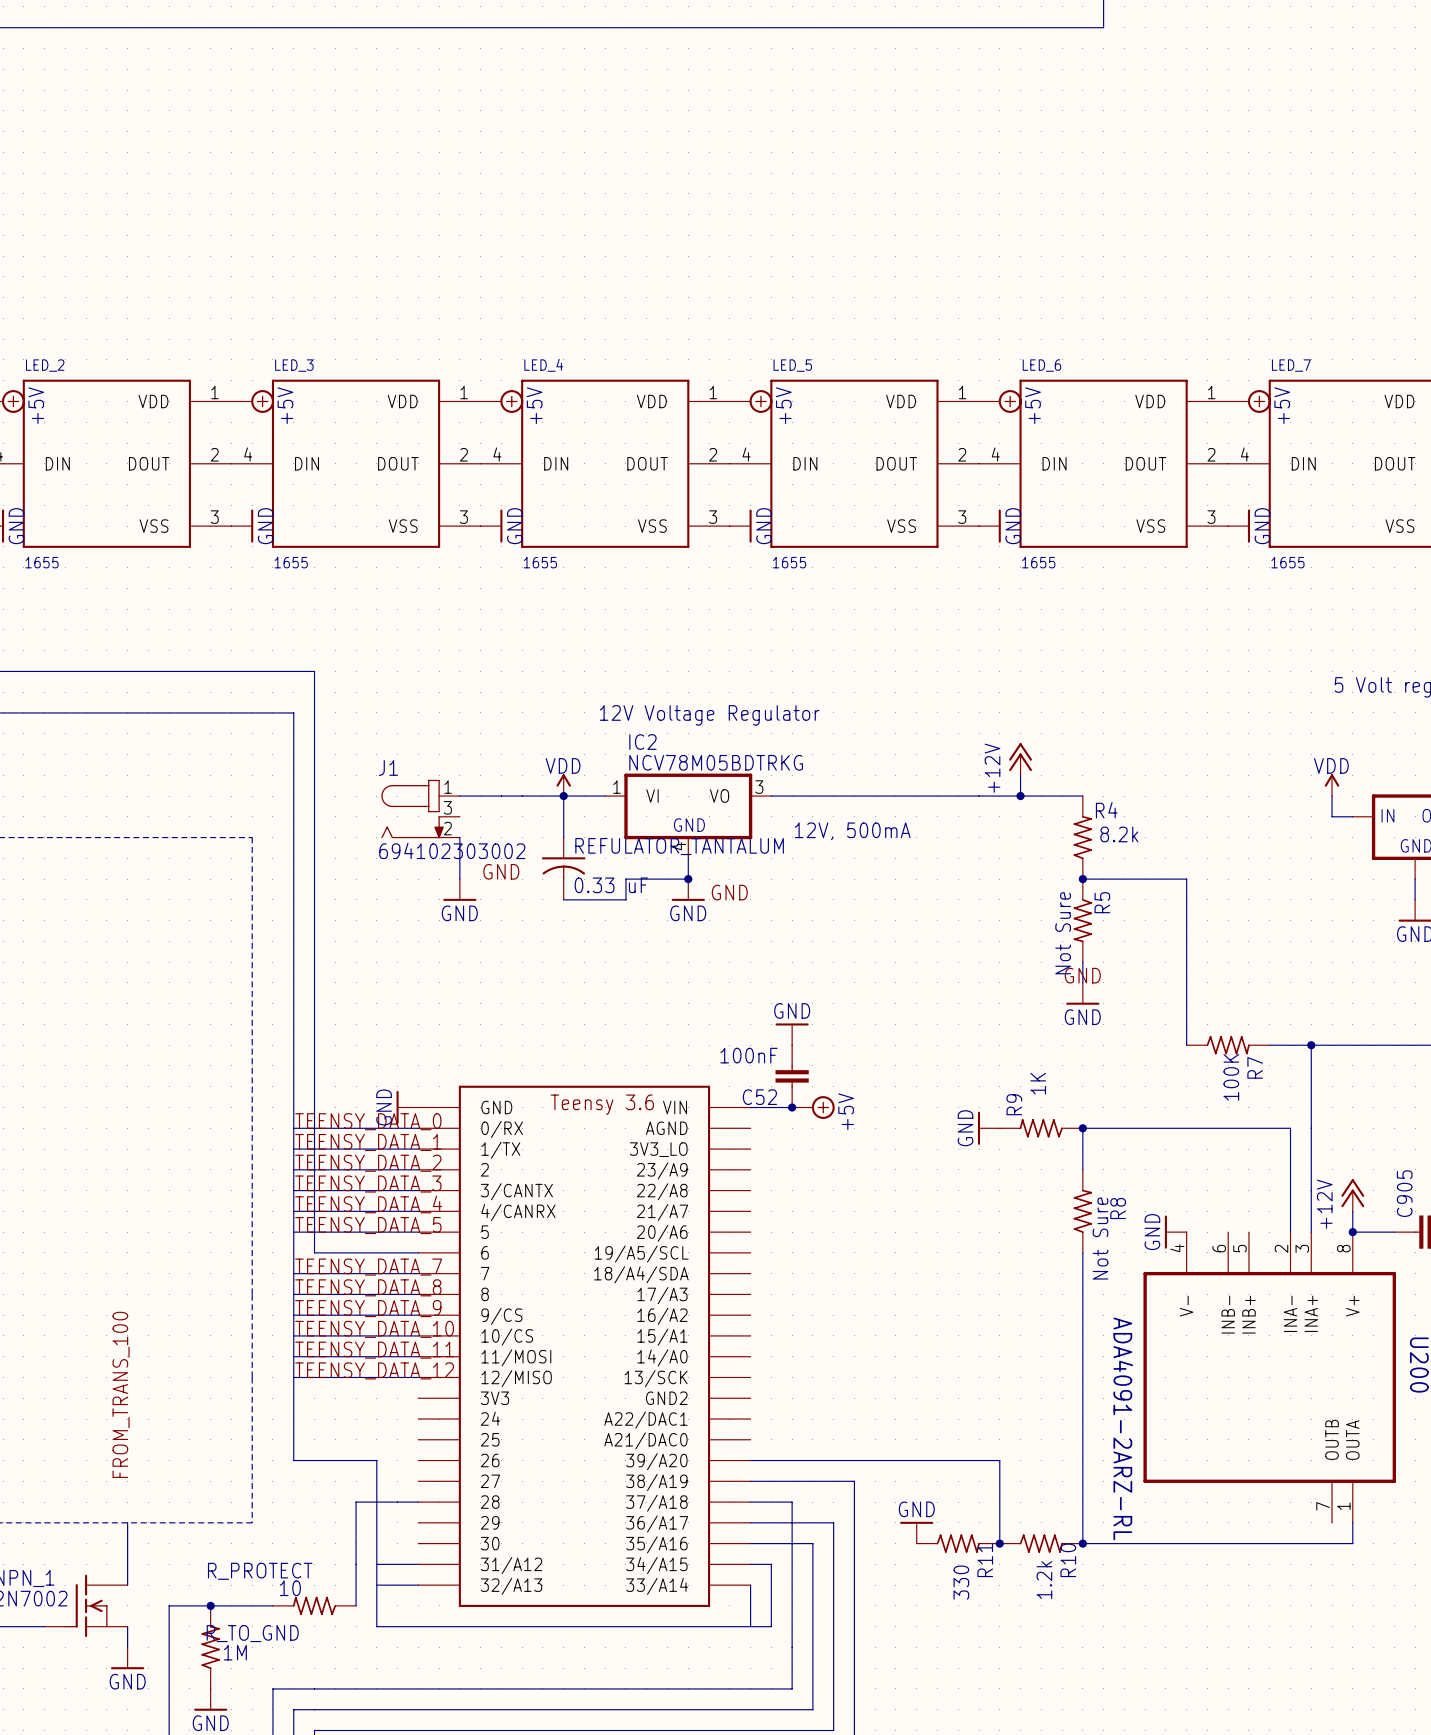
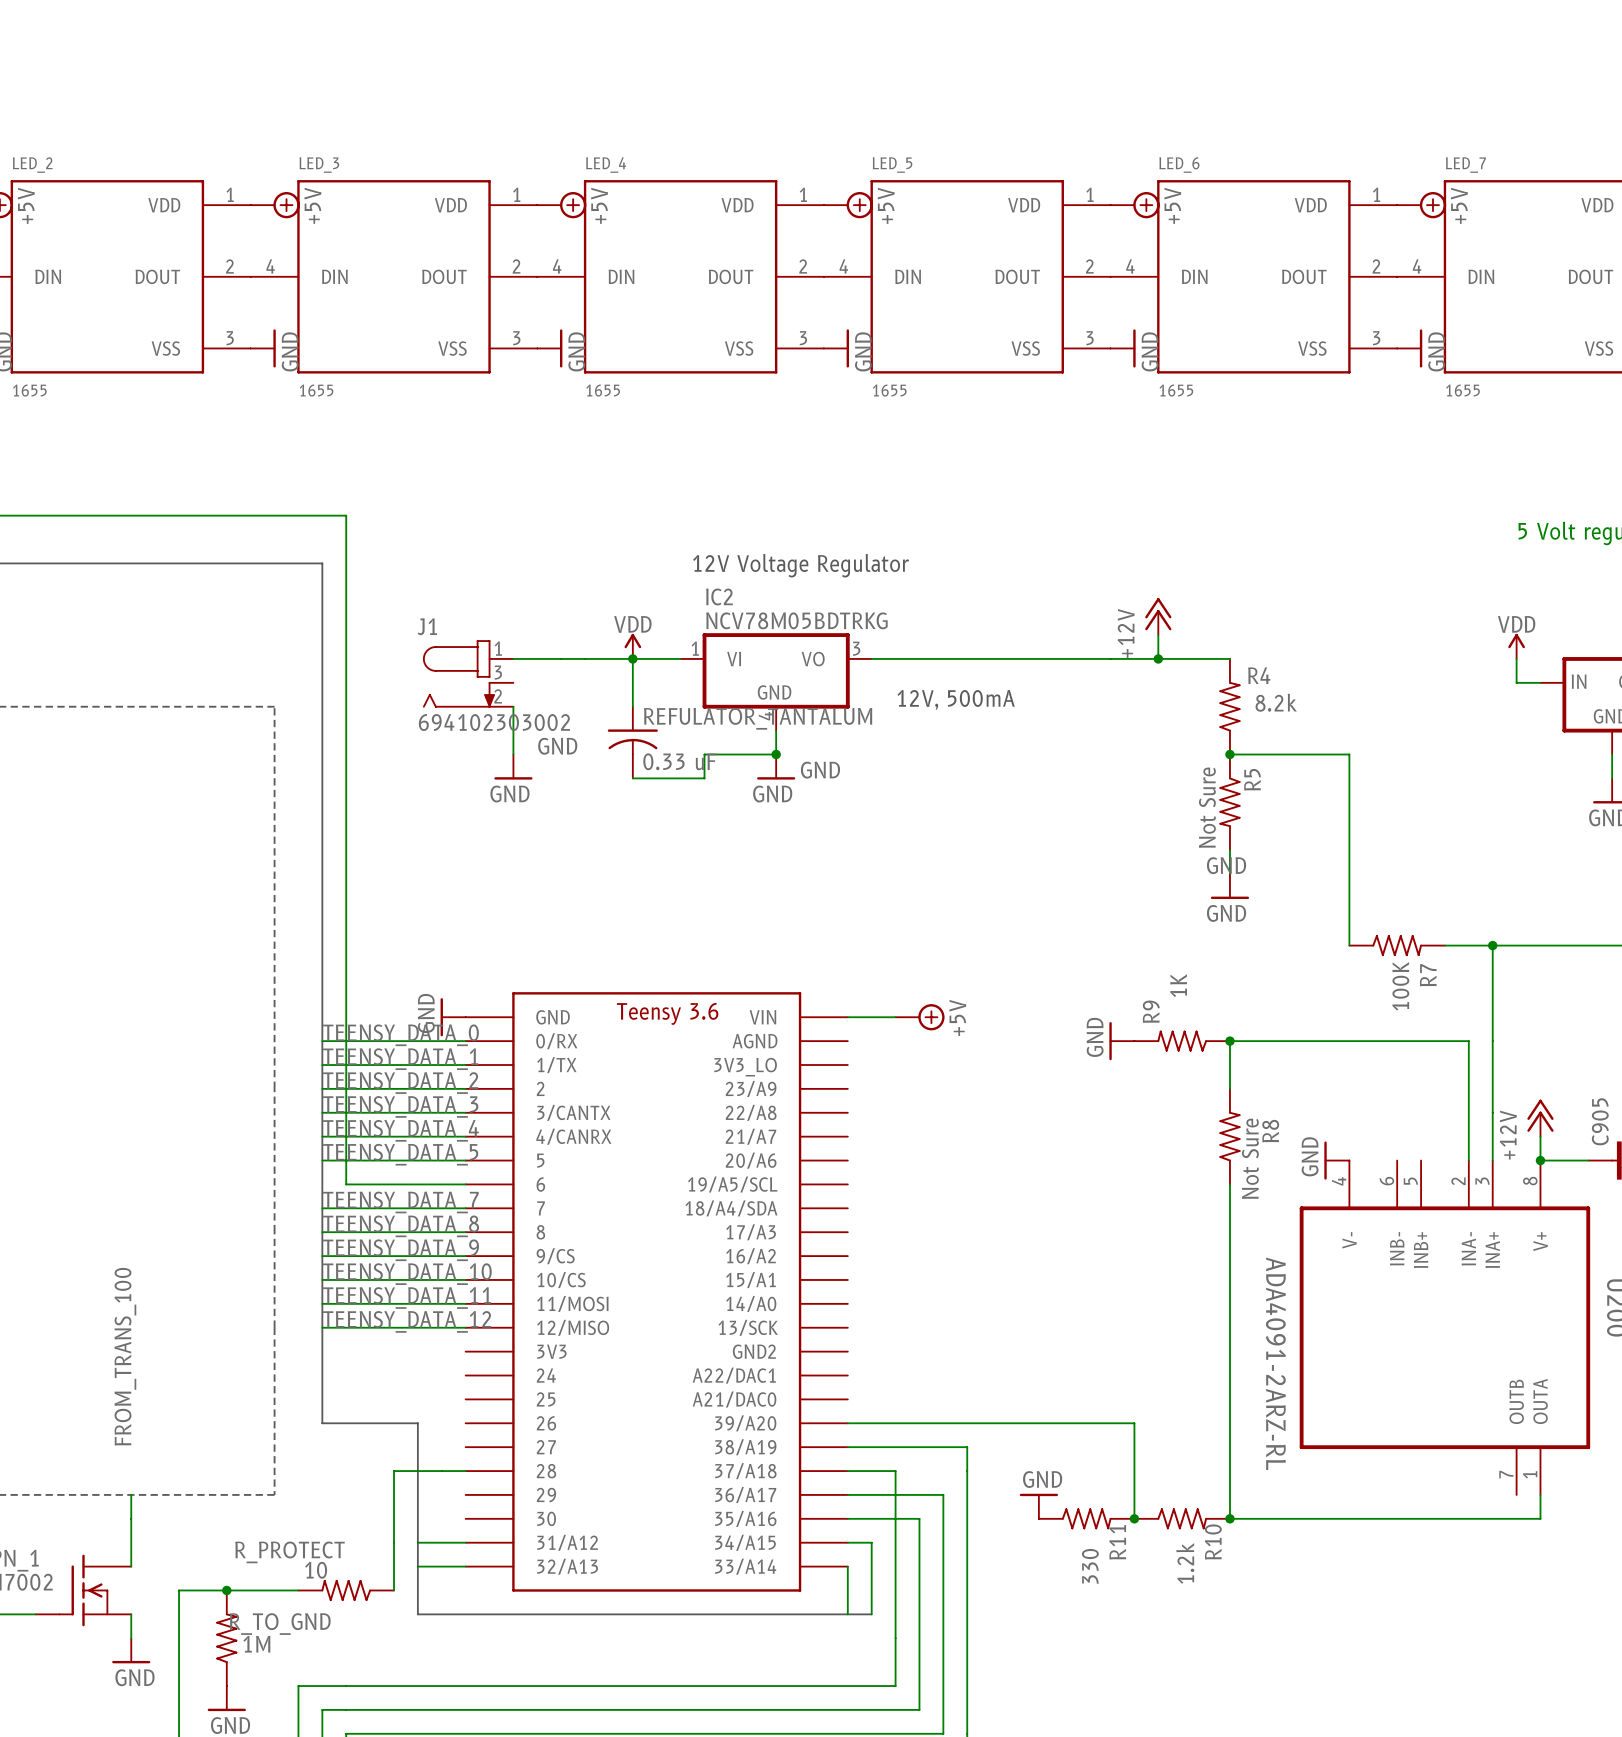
power symbol: GND (792, 1034) -> none
C52: 100nF (792, 1076) -> none
junction: (792, 1107) -> none

